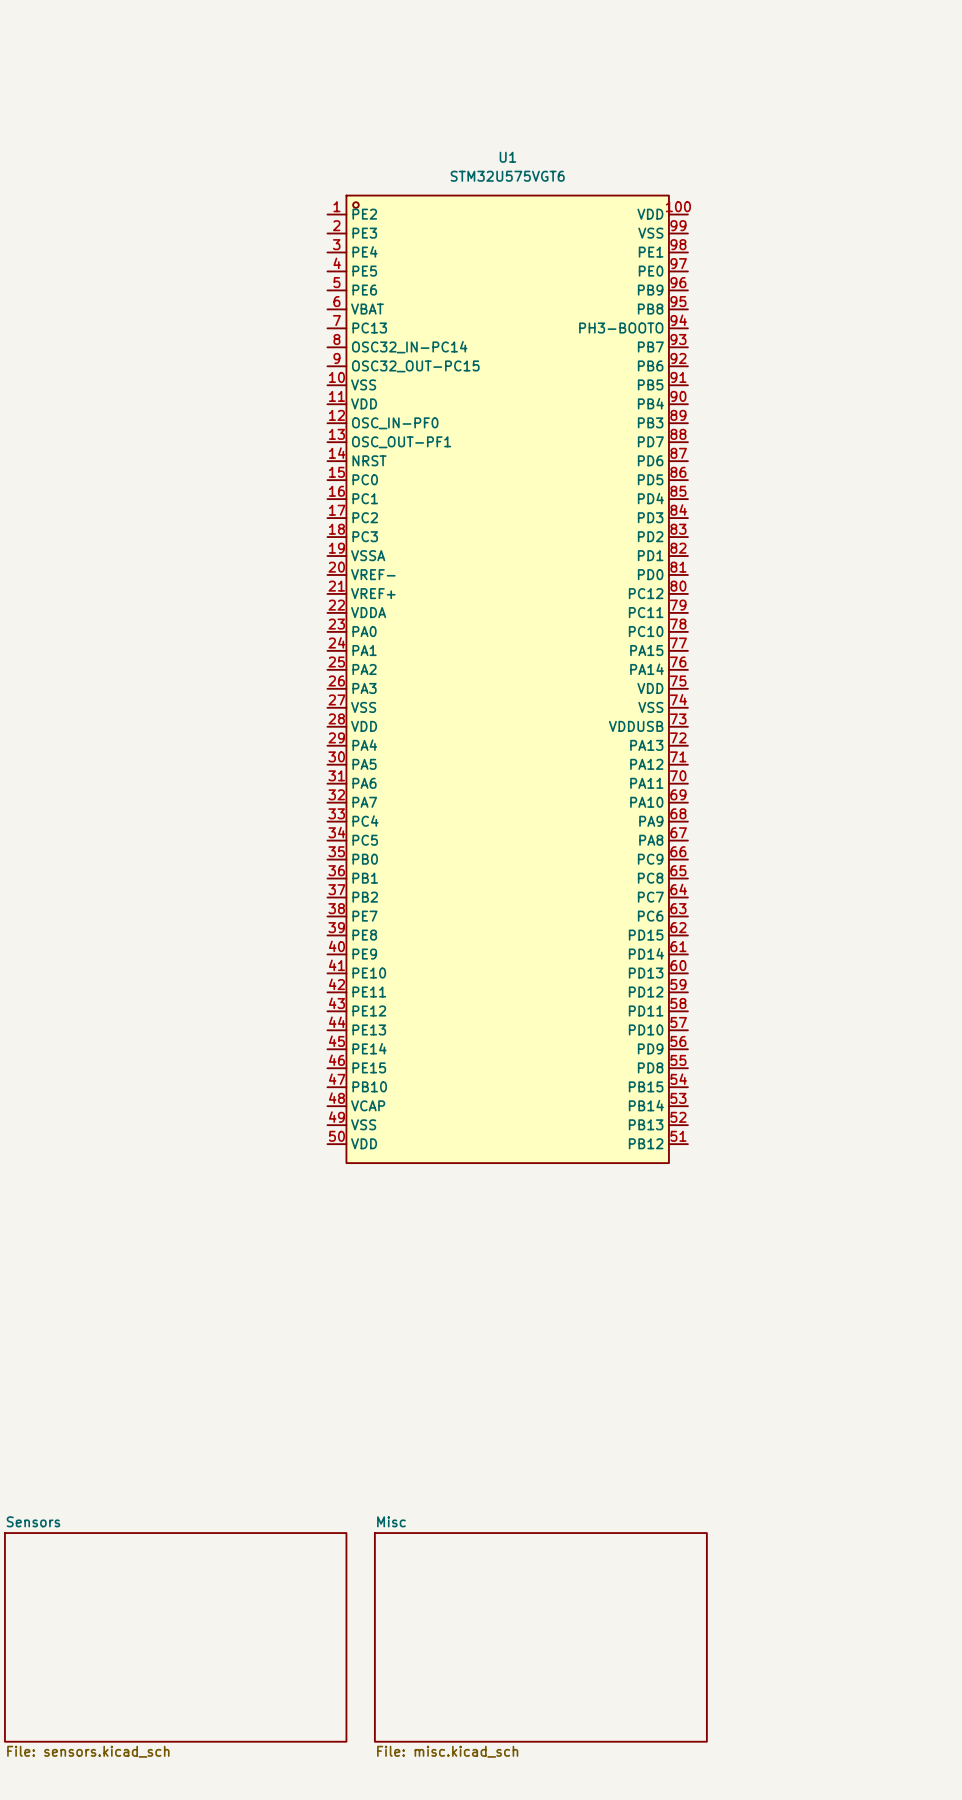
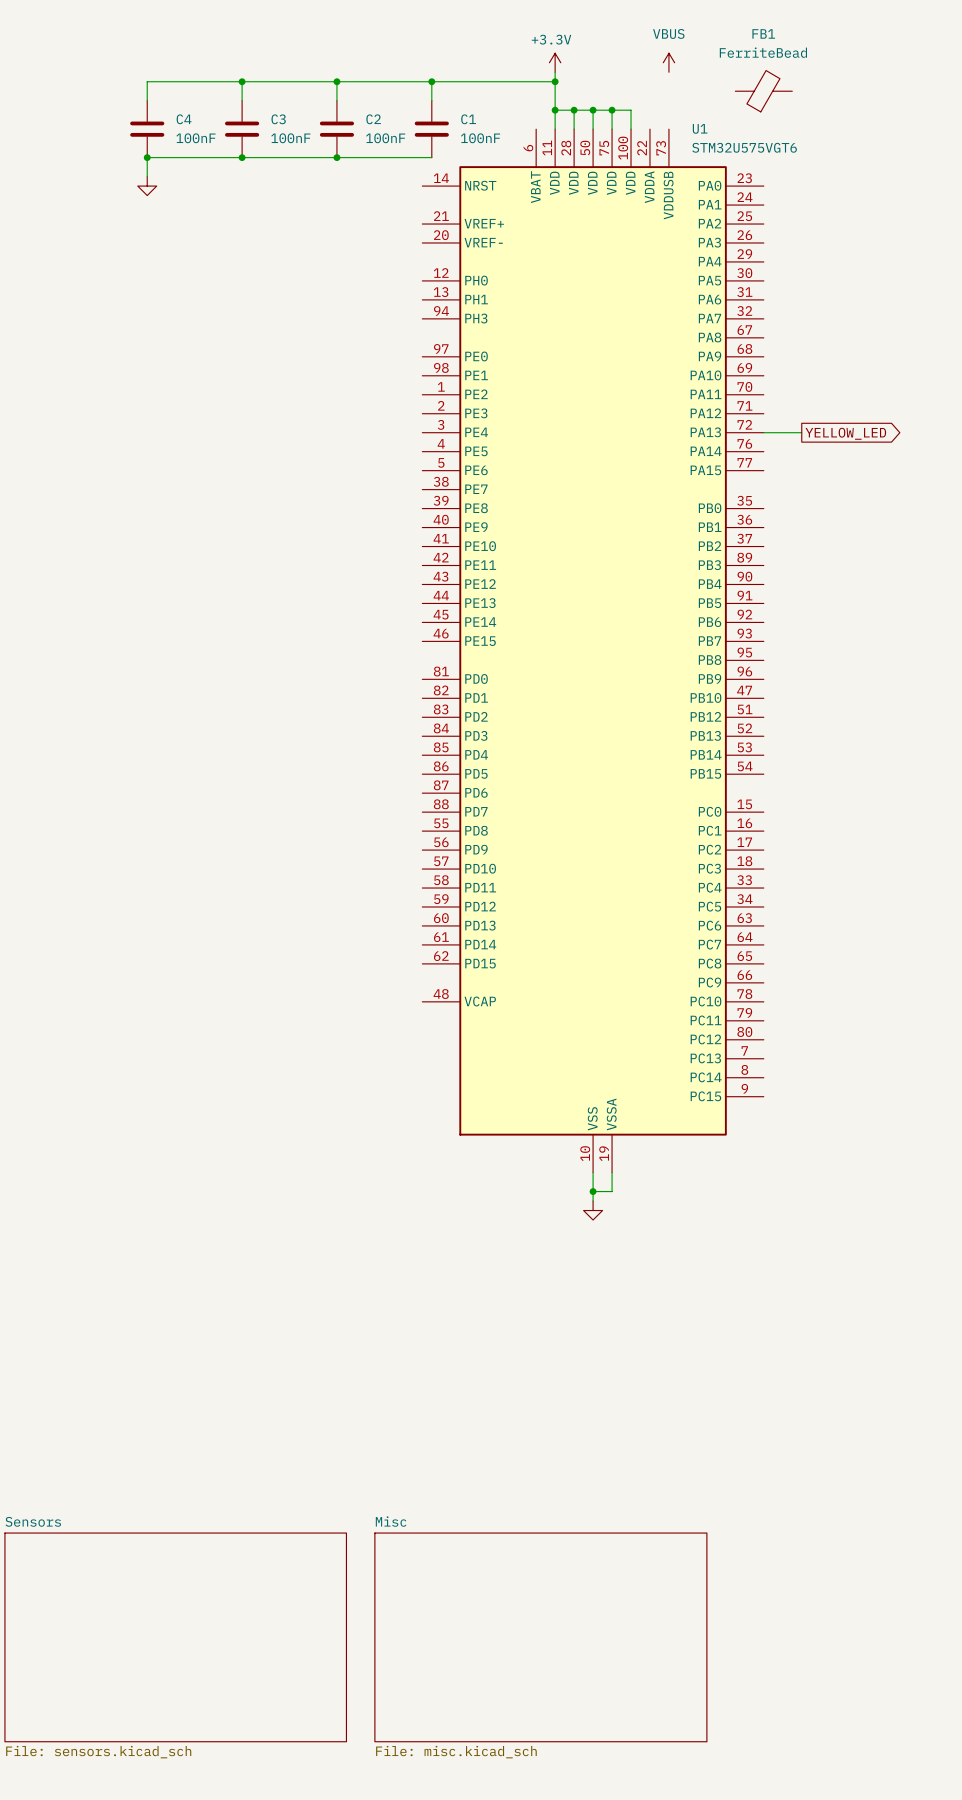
power symbol: none -> +3.3V (555, 62)
power symbol: none -> VBUS (668, 62)
wire: none -> (555, 72) (555, 129)
wire: none -> (242, 81) (242, 100)
junction: none -> (242, 81)
wire: none -> (336, 81) (336, 100)
junction: none -> (336, 81)
wire: none -> (431, 81) (431, 100)
junction: none -> (431, 81)
wire: none -> (555, 81) (147, 81) (147, 100)
junction: none -> (555, 81)
FB1: none -> FerriteBead (763, 91)
wire: none -> (555, 110) (631, 110) (631, 129)
junction: none -> (555, 110)
wire: none -> (574, 110) (574, 129)
junction: none -> (574, 110)
wire: none -> (593, 110) (593, 129)
junction: none -> (593, 110)
wire: none -> (612, 110) (612, 129)
junction: none -> (612, 110)
C4: none -> 100nF (147, 129)
C3: none -> 100nF (242, 129)
C2: none -> 100nF (336, 129)
C1: none -> 100nF (431, 129)
junction: none -> (147, 157)
junction: none -> (242, 157)
junction: none -> (336, 157)
wire: none -> (431, 157) (147, 157) (147, 176)
U1 name position: U1 (507, 157) -> U1 (700, 128)
U1 value position: STM32U575VGT6 (507, 176) -> STM32U575VGT6 (744, 147)
power symbol: none -> (147, 186)
U1 symbol: [327, 195, 688, 1164] -> [422, 129, 764, 1173]
wire: none -> (763, 432) (801, 432)
global label: none -> YELLOW_LED (845, 433)
wire: none -> (593, 1172) (593, 1201)
wire: none -> (612, 1172) (612, 1191) (593, 1191)
junction: none -> (593, 1191)
power symbol: none -> (593, 1210)

